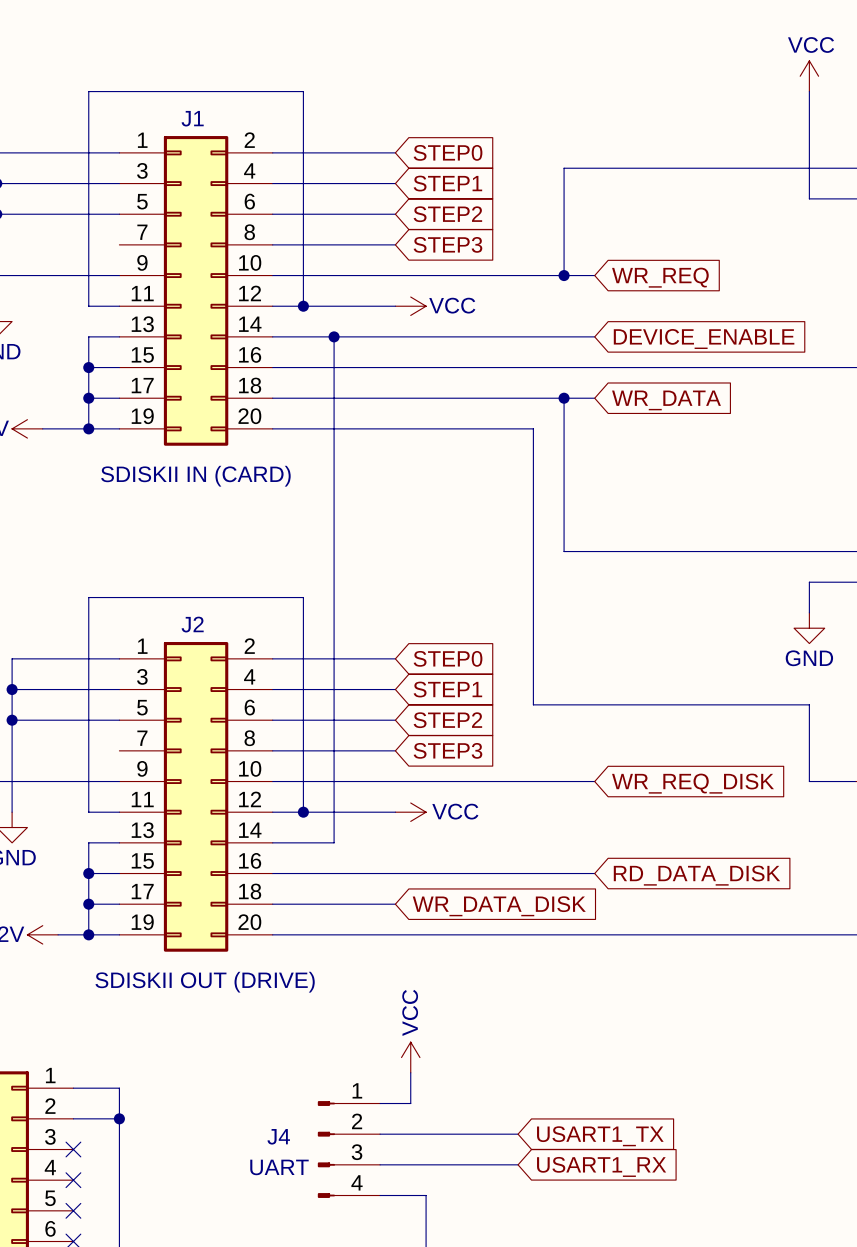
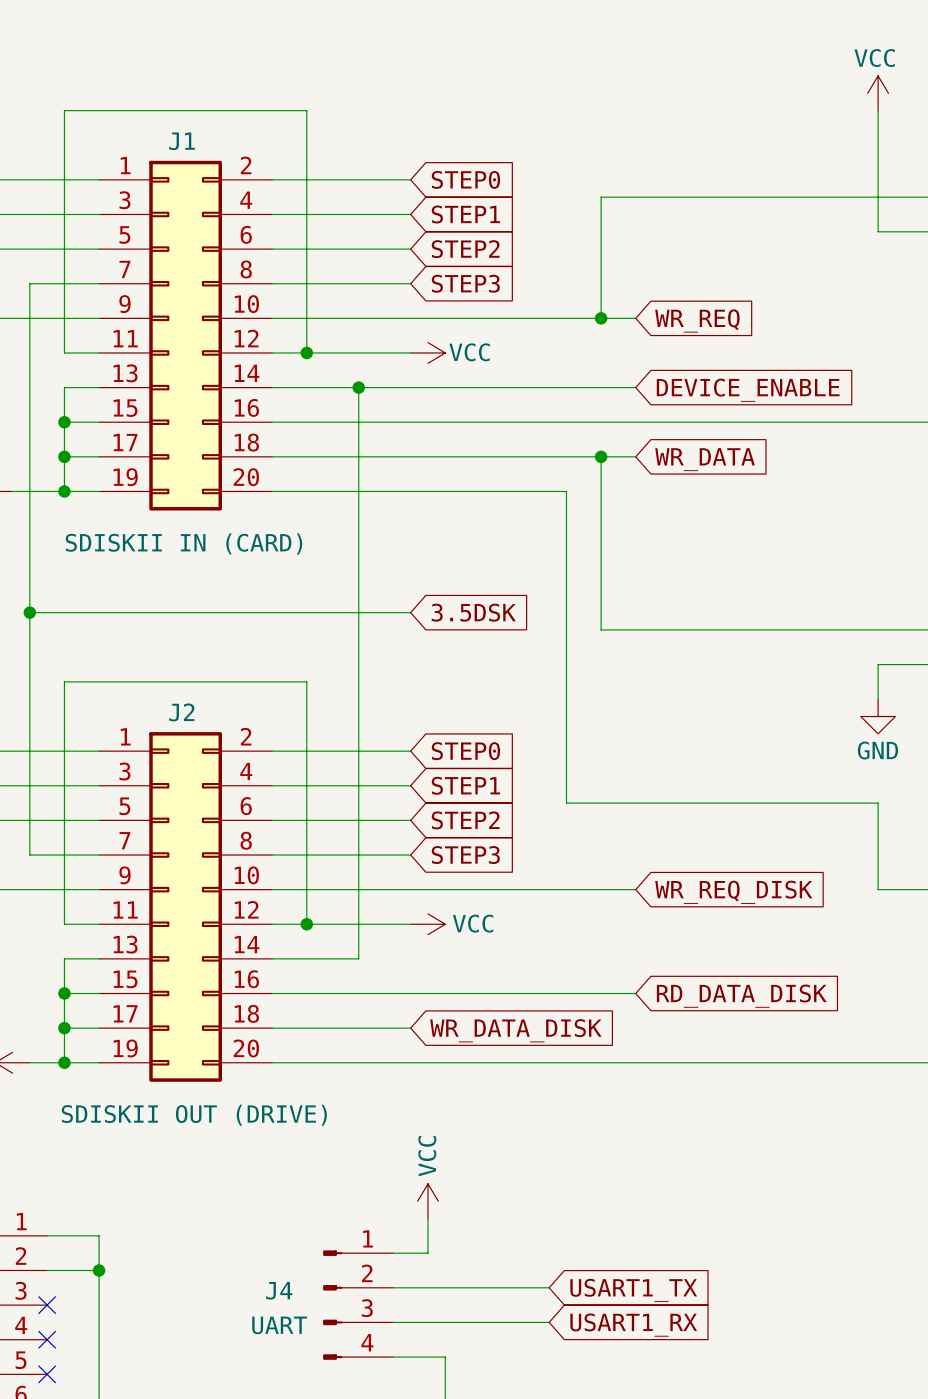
wire: none -> (99, 283) (29, 283) (29, 855) (99, 855)
wire: (334, 336) (334, 842) -> (358, 387) (358, 958) (341, 958)
junction position: (334, 336) -> (358, 387)
wire: none -> (29, 612) (410, 612)
junction: none -> (29, 612)
global label: none -> 3.5DSK (473, 612)

